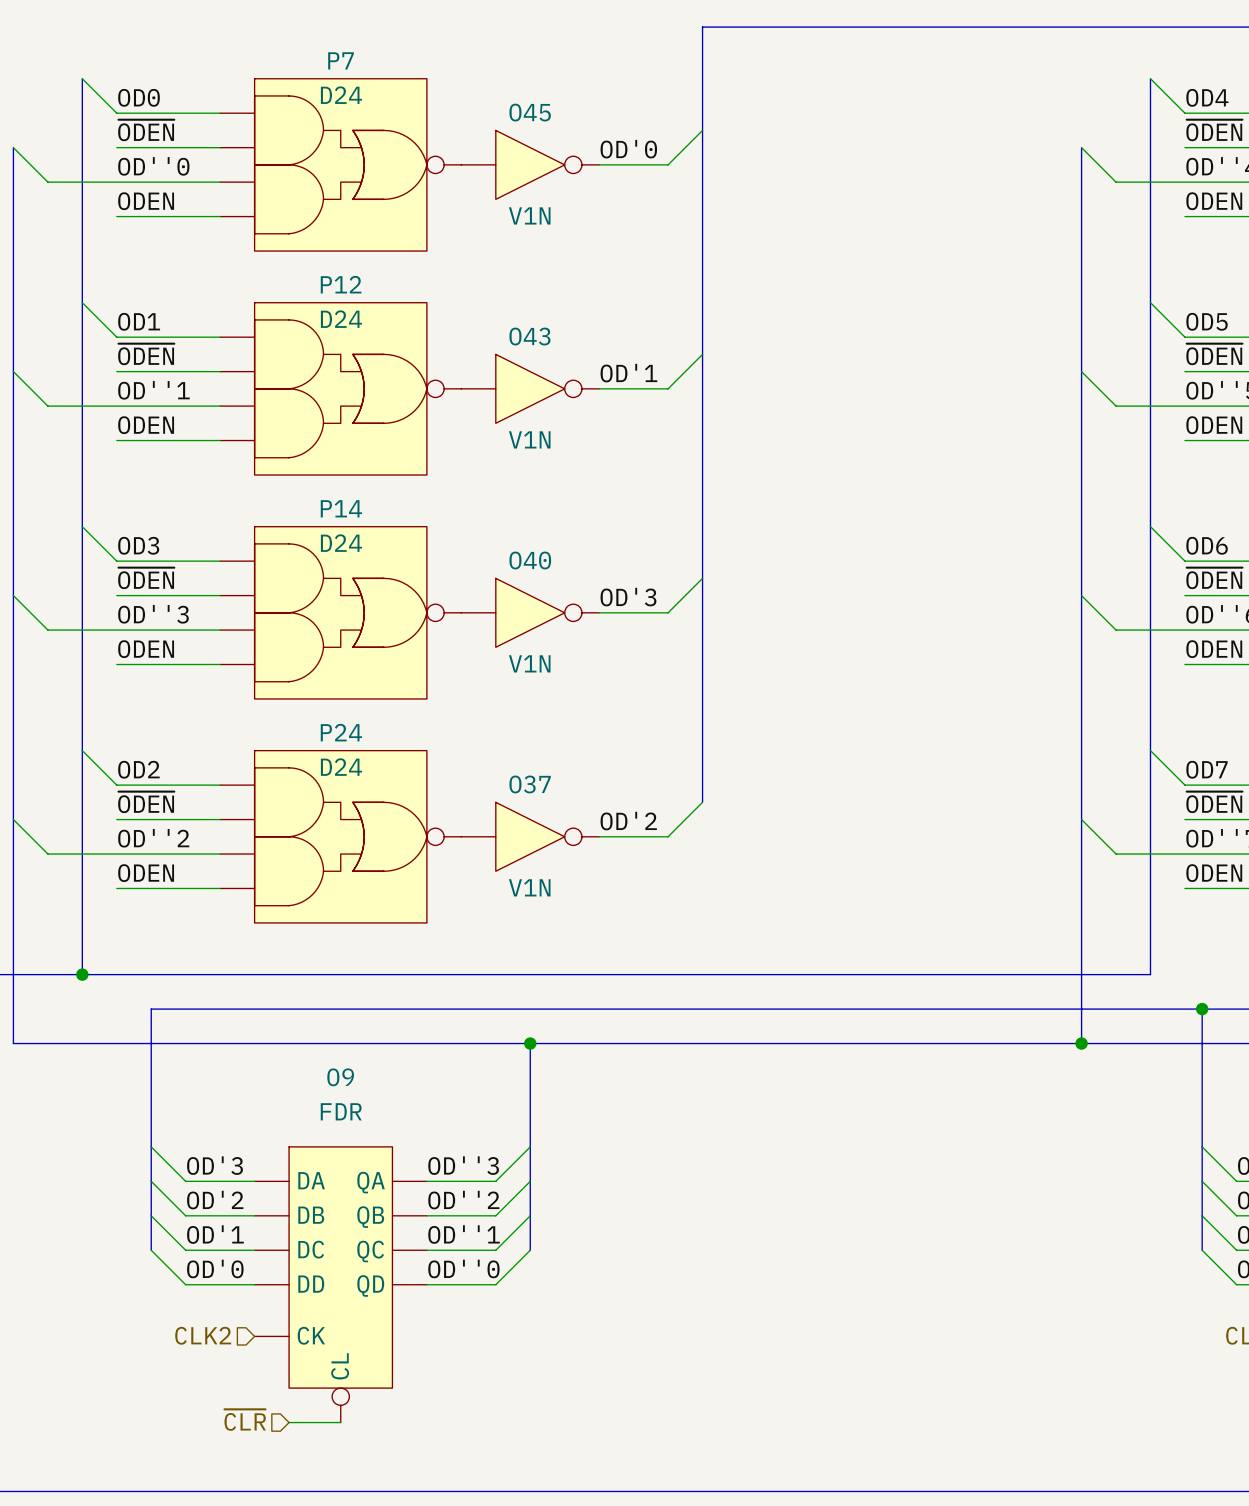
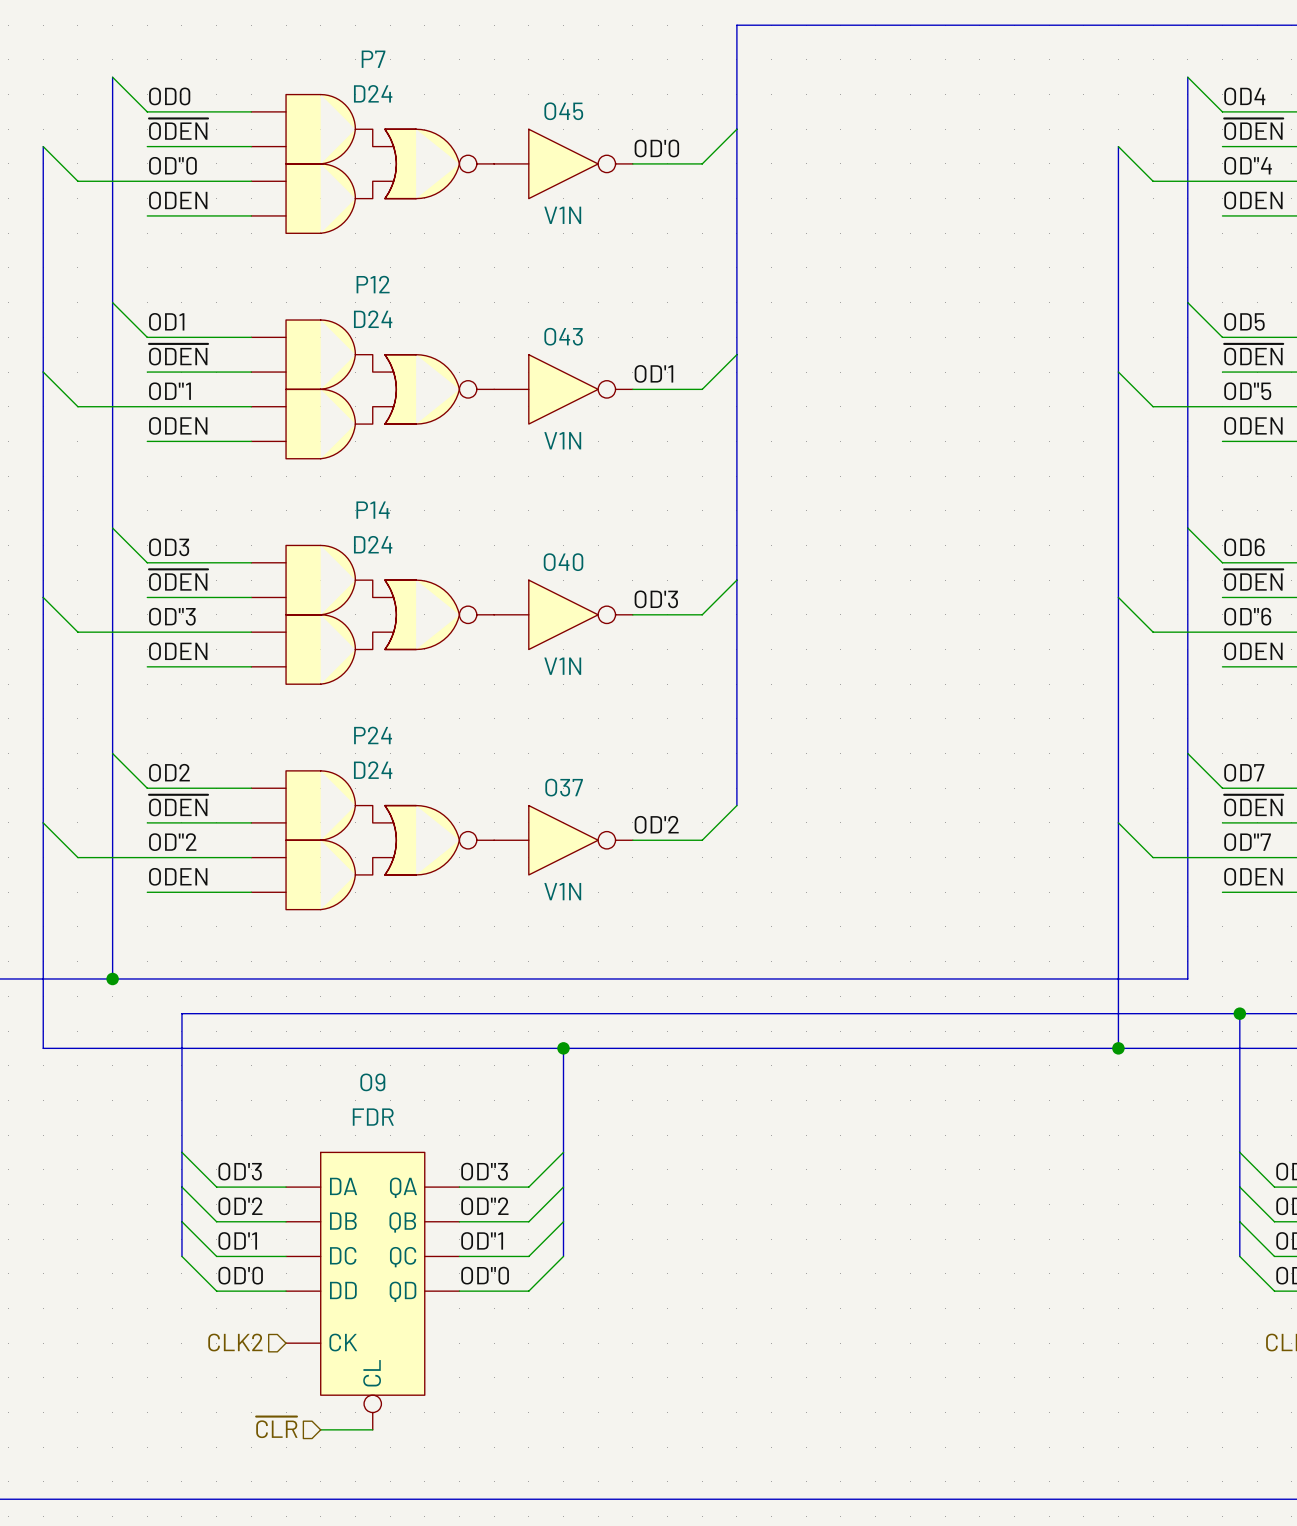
P7 symbol: [220, 78, 462, 252] -> [251, 94, 495, 234]
P12 symbol: [220, 302, 462, 476] -> [251, 320, 495, 459]
P14 symbol: [220, 526, 462, 699] -> [251, 545, 495, 685]
P24 symbol: [220, 750, 462, 923] -> [251, 770, 495, 910]

